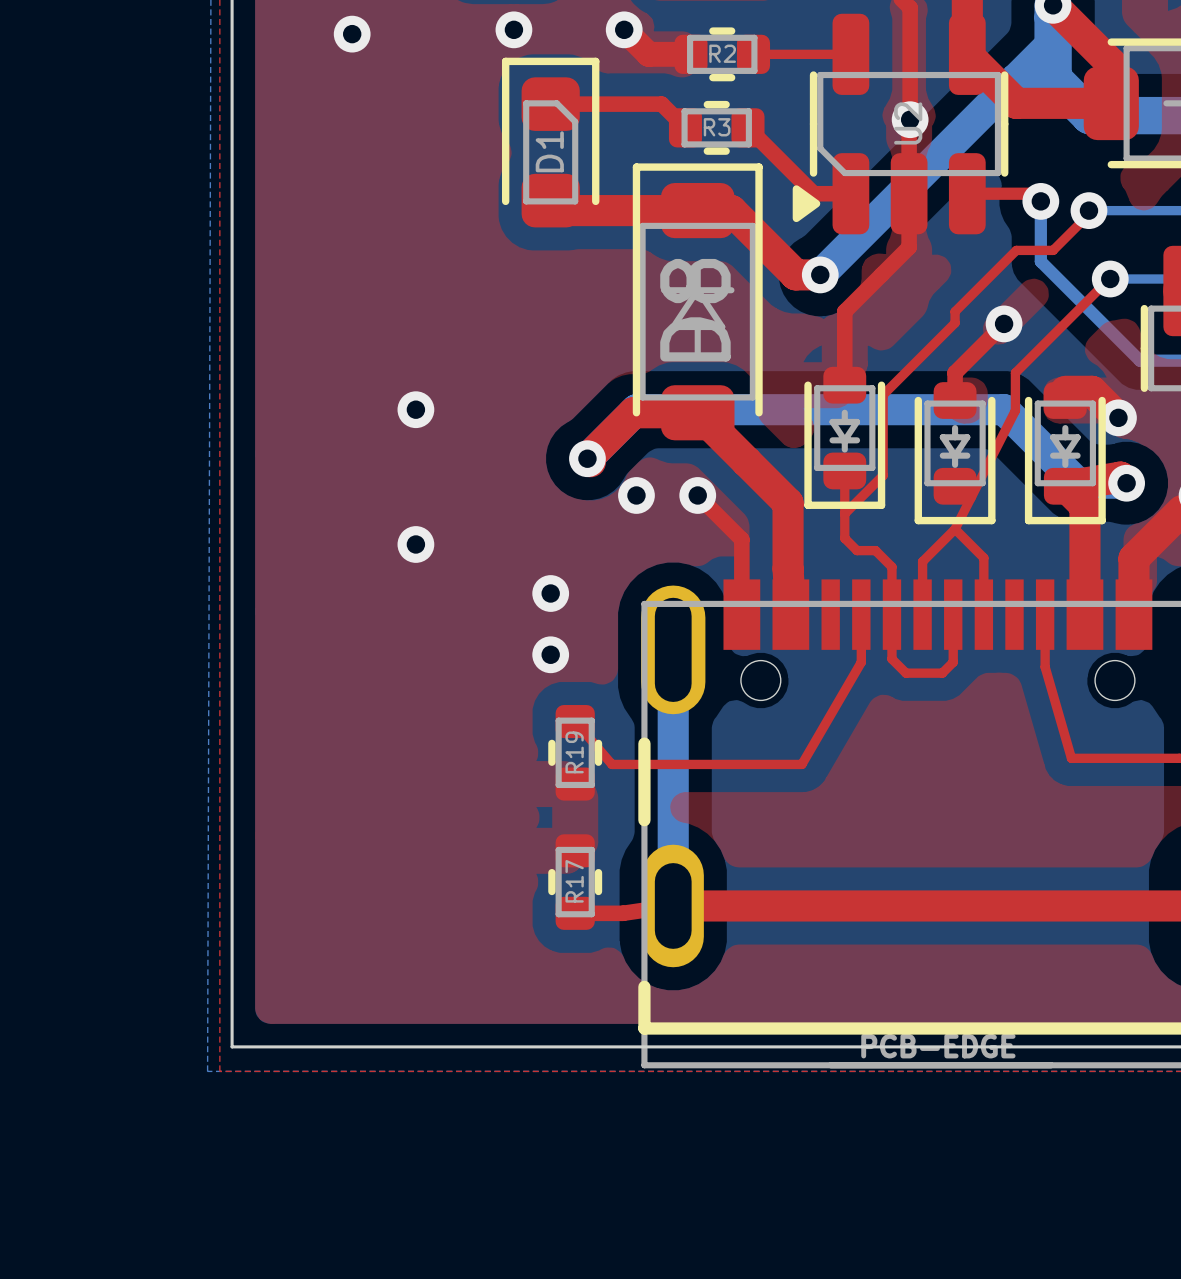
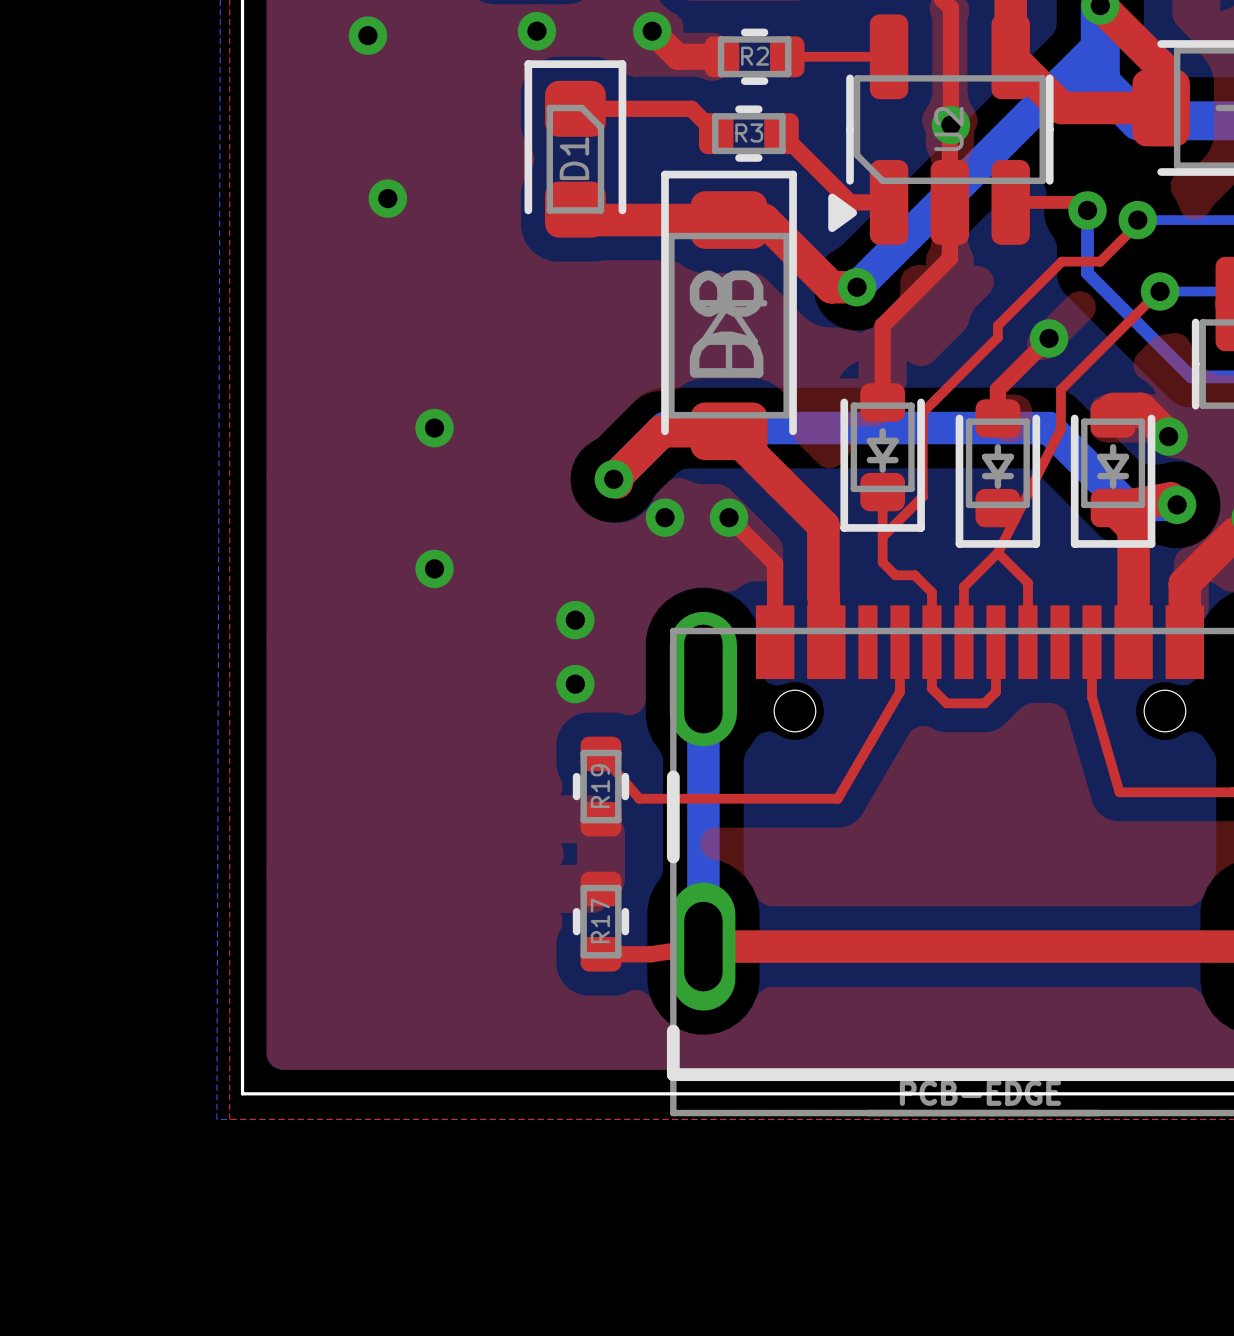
via: none -> (387, 198)

